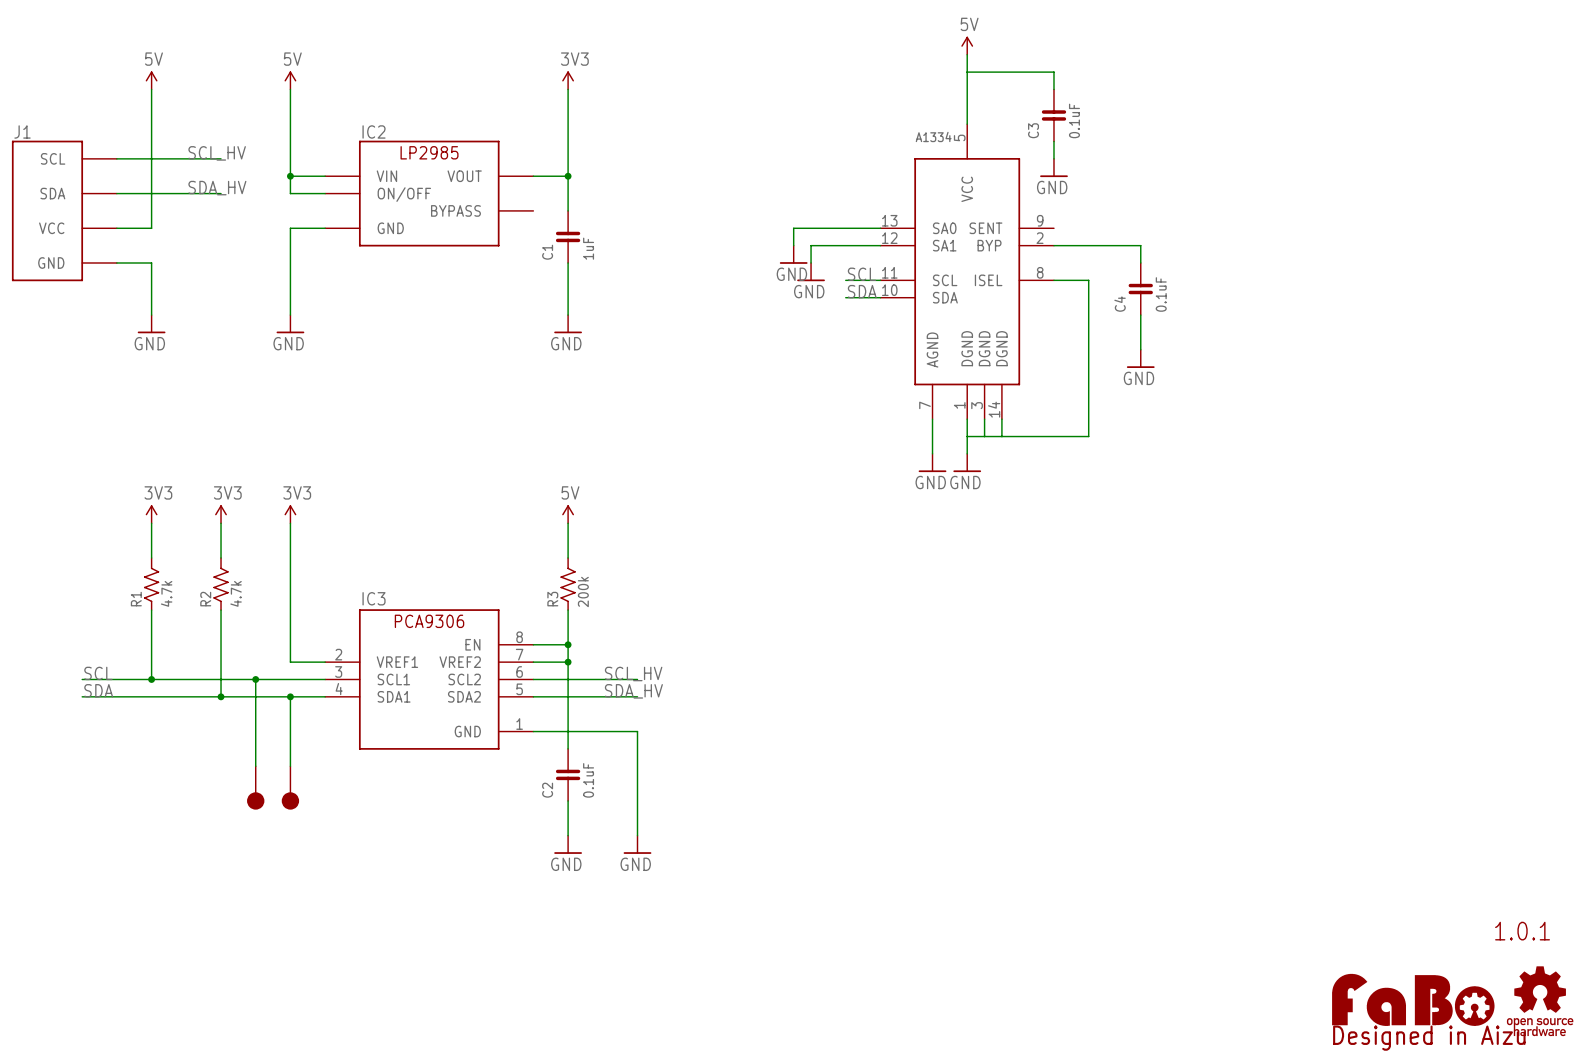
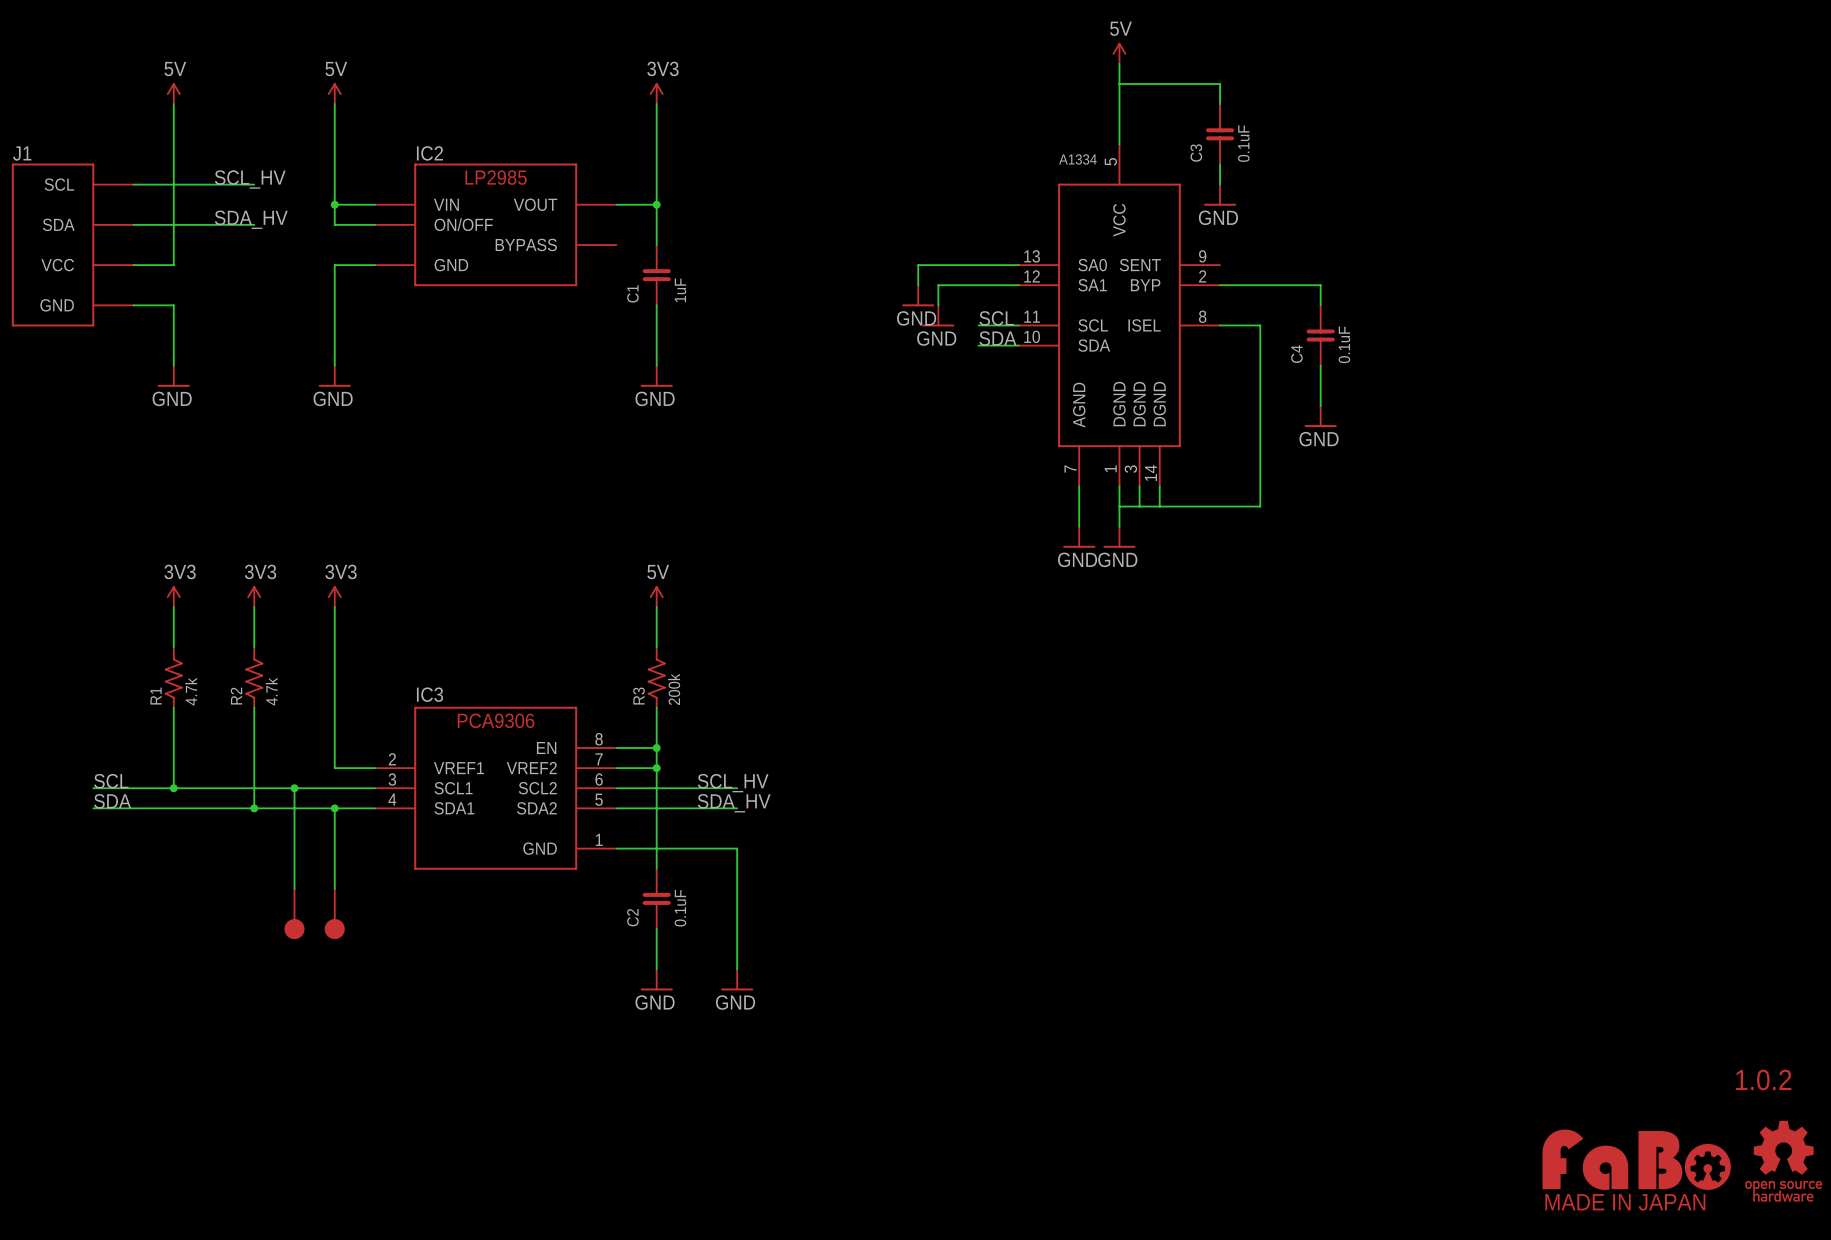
text: 1.0.1 (1522, 931) -> 1.0.2 (1763, 1079)
part text: none -> MADE IN JAPAN (1625, 1202)
part text: Designed in Aizu (1429, 1038) -> none

